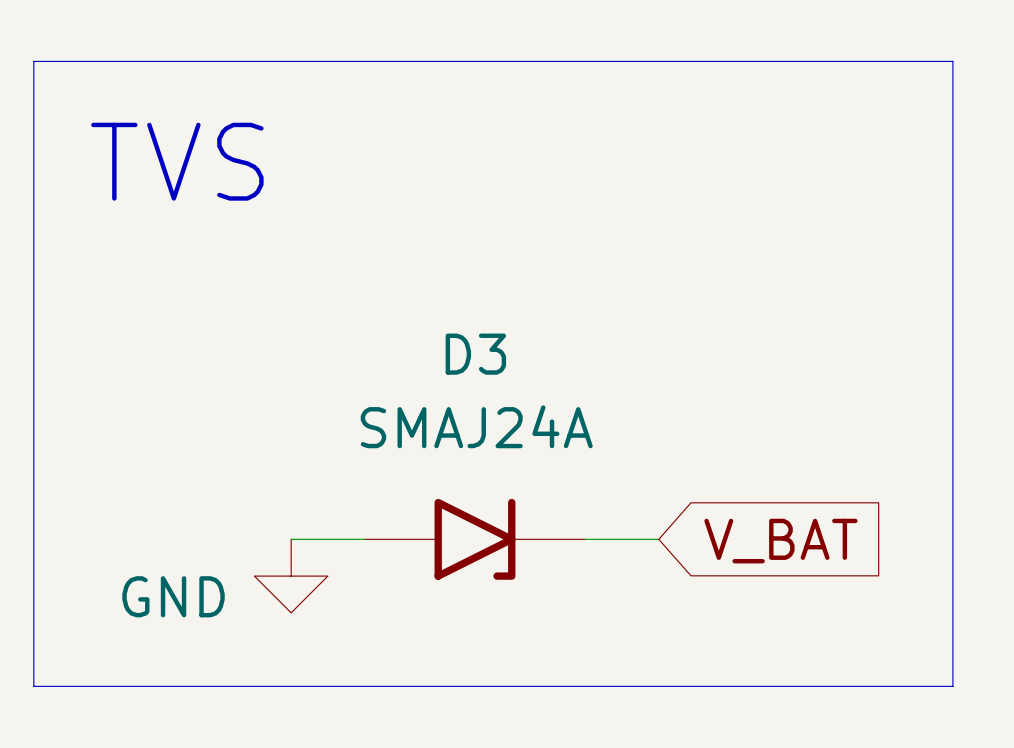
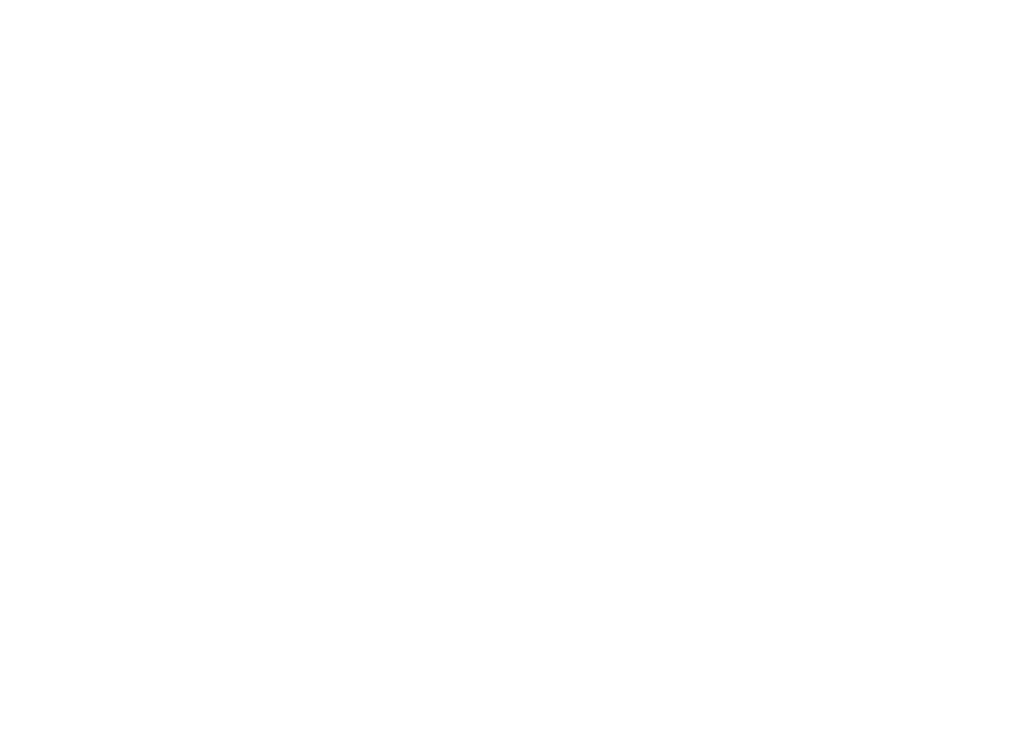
line: (33, 61) (952, 61) (952, 686) (33, 686) (33, 61) -> none
text: TVS (177, 161) -> none
wire: (291, 539) (364, 539) -> none
D3: SMAJ24A (474, 539) -> none
wire: (585, 539) (658, 539) -> none
global label: V_BAT (780, 541) -> none
power symbol: GND (291, 576) -> none

